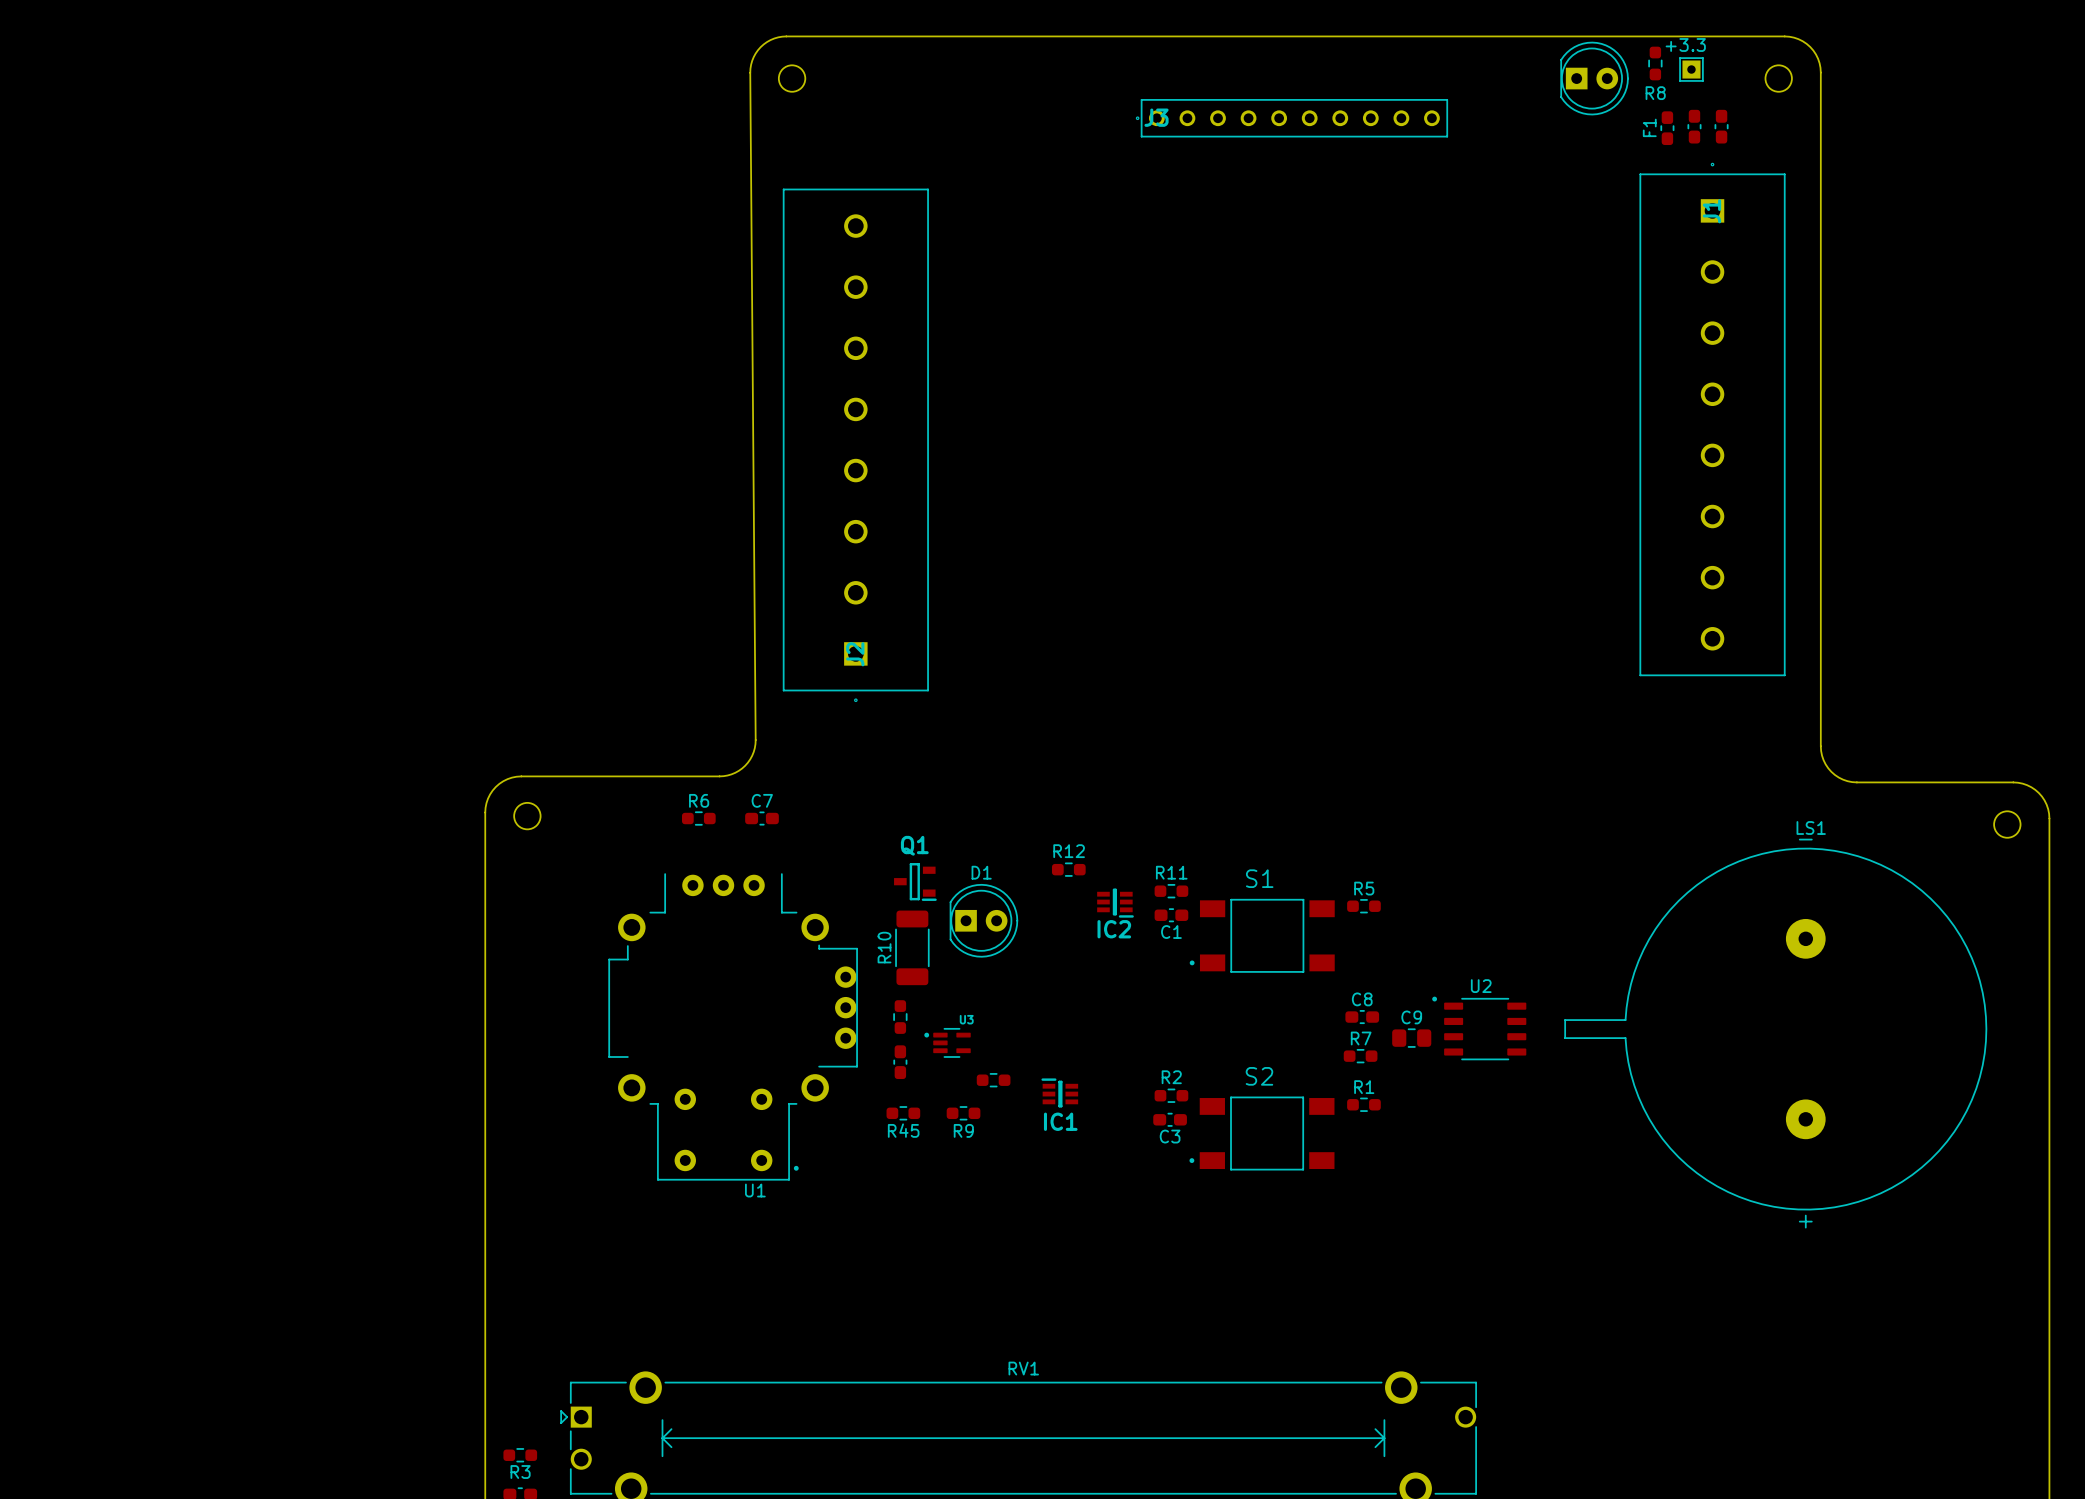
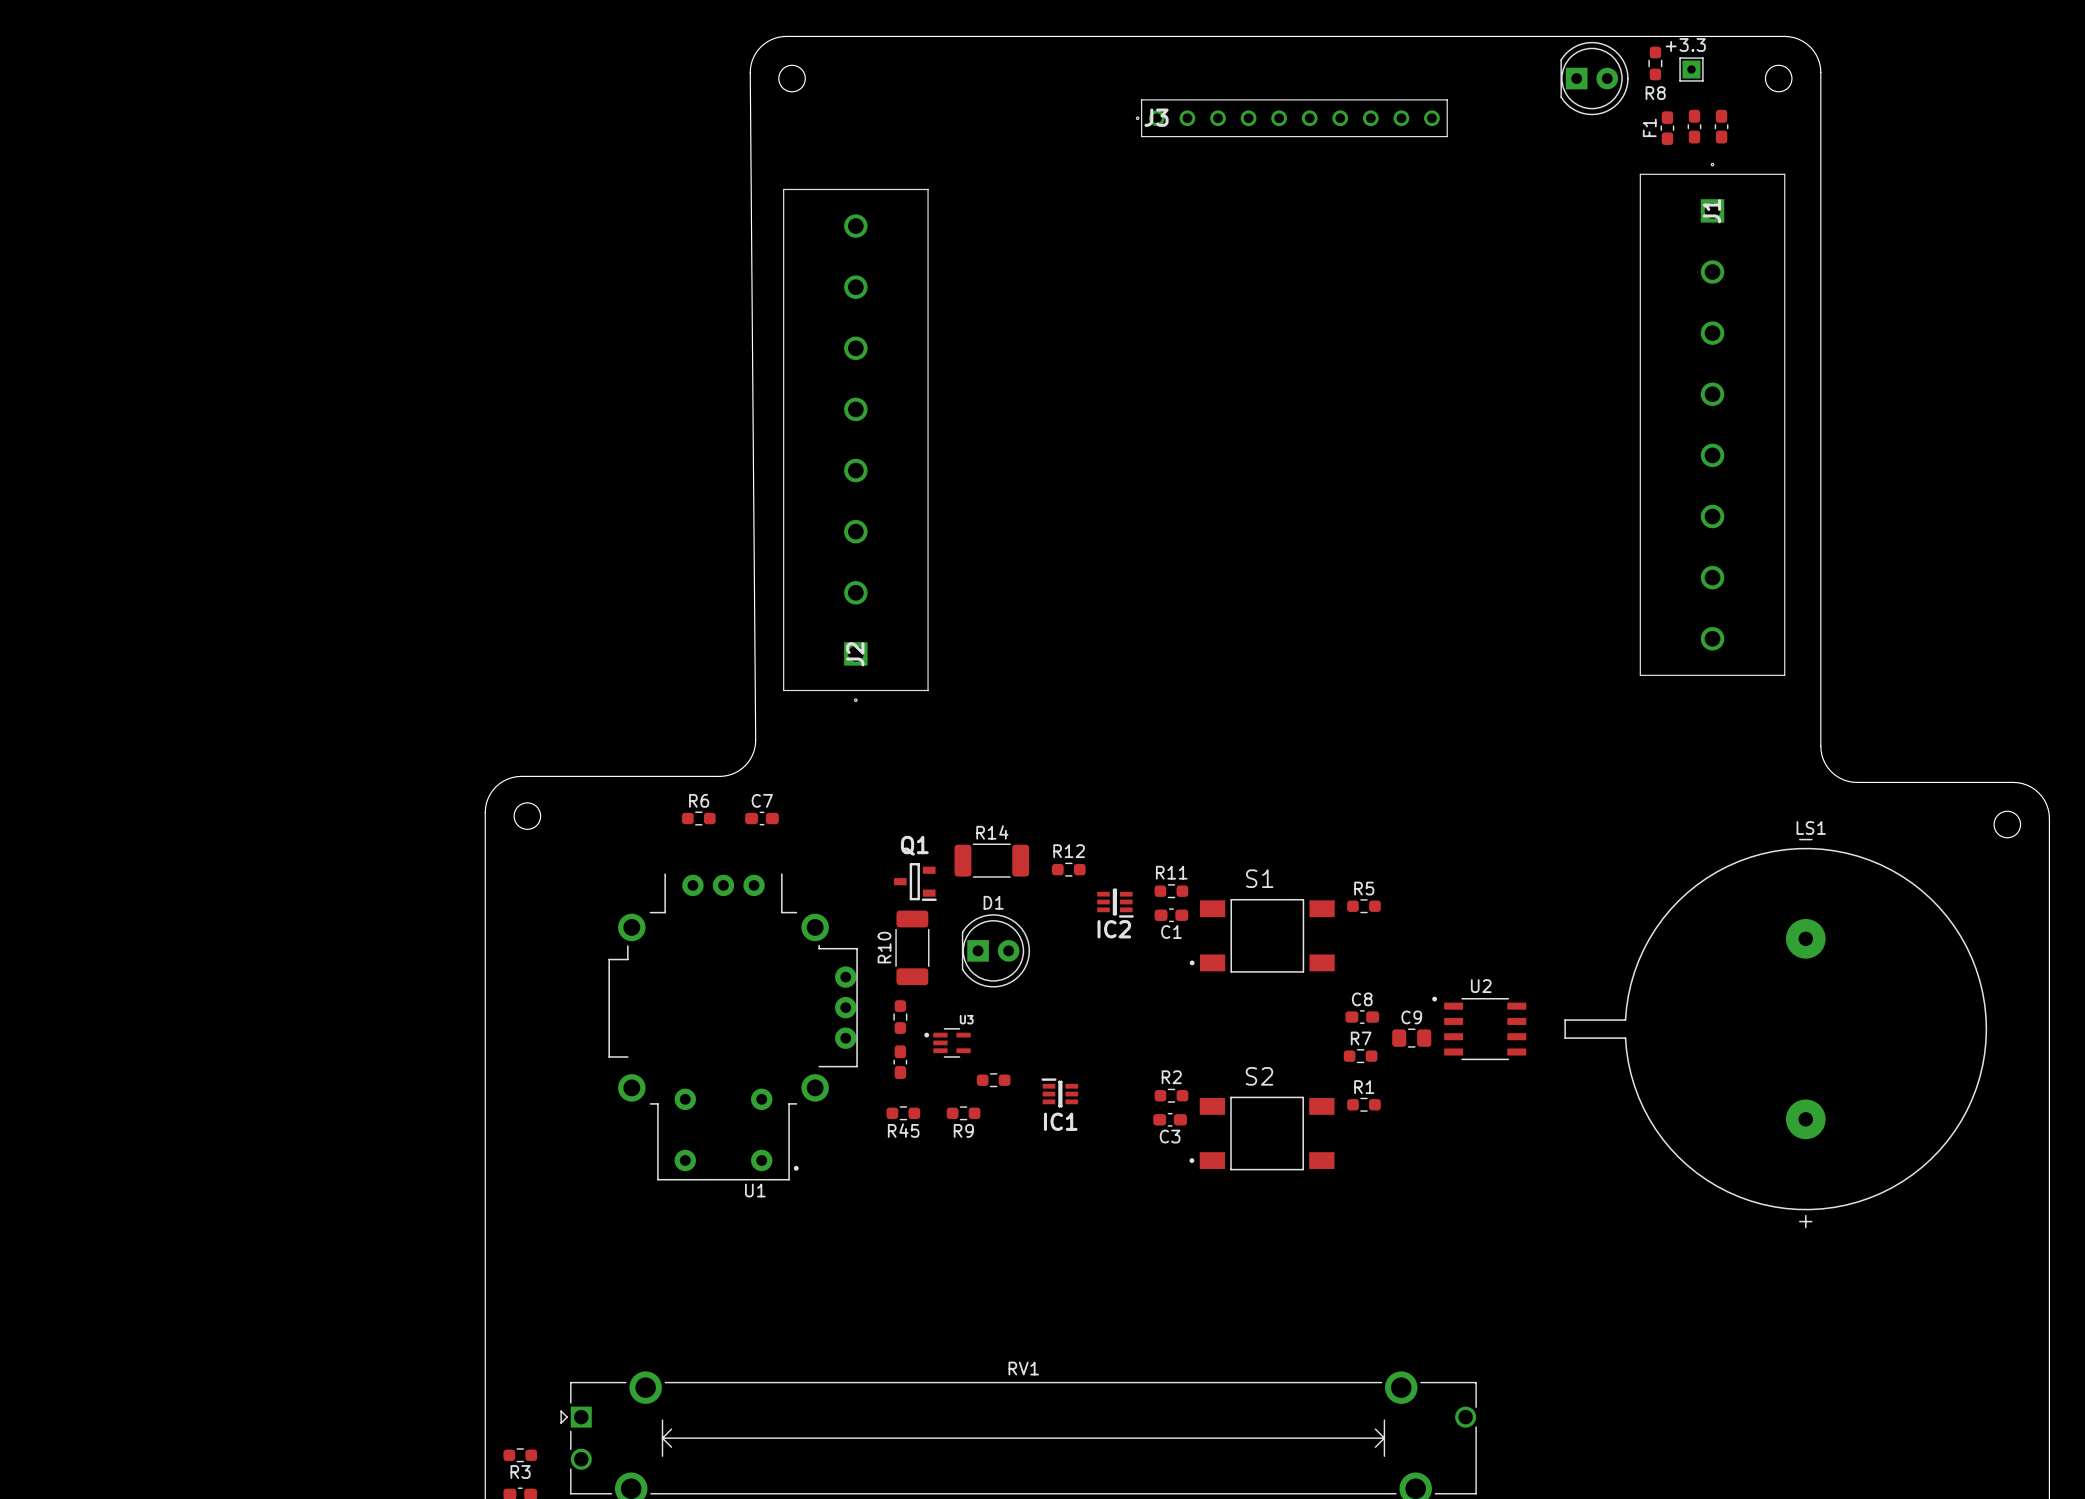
R14: none -> (991, 860)
D1 position: (983, 920) -> (995, 950)

